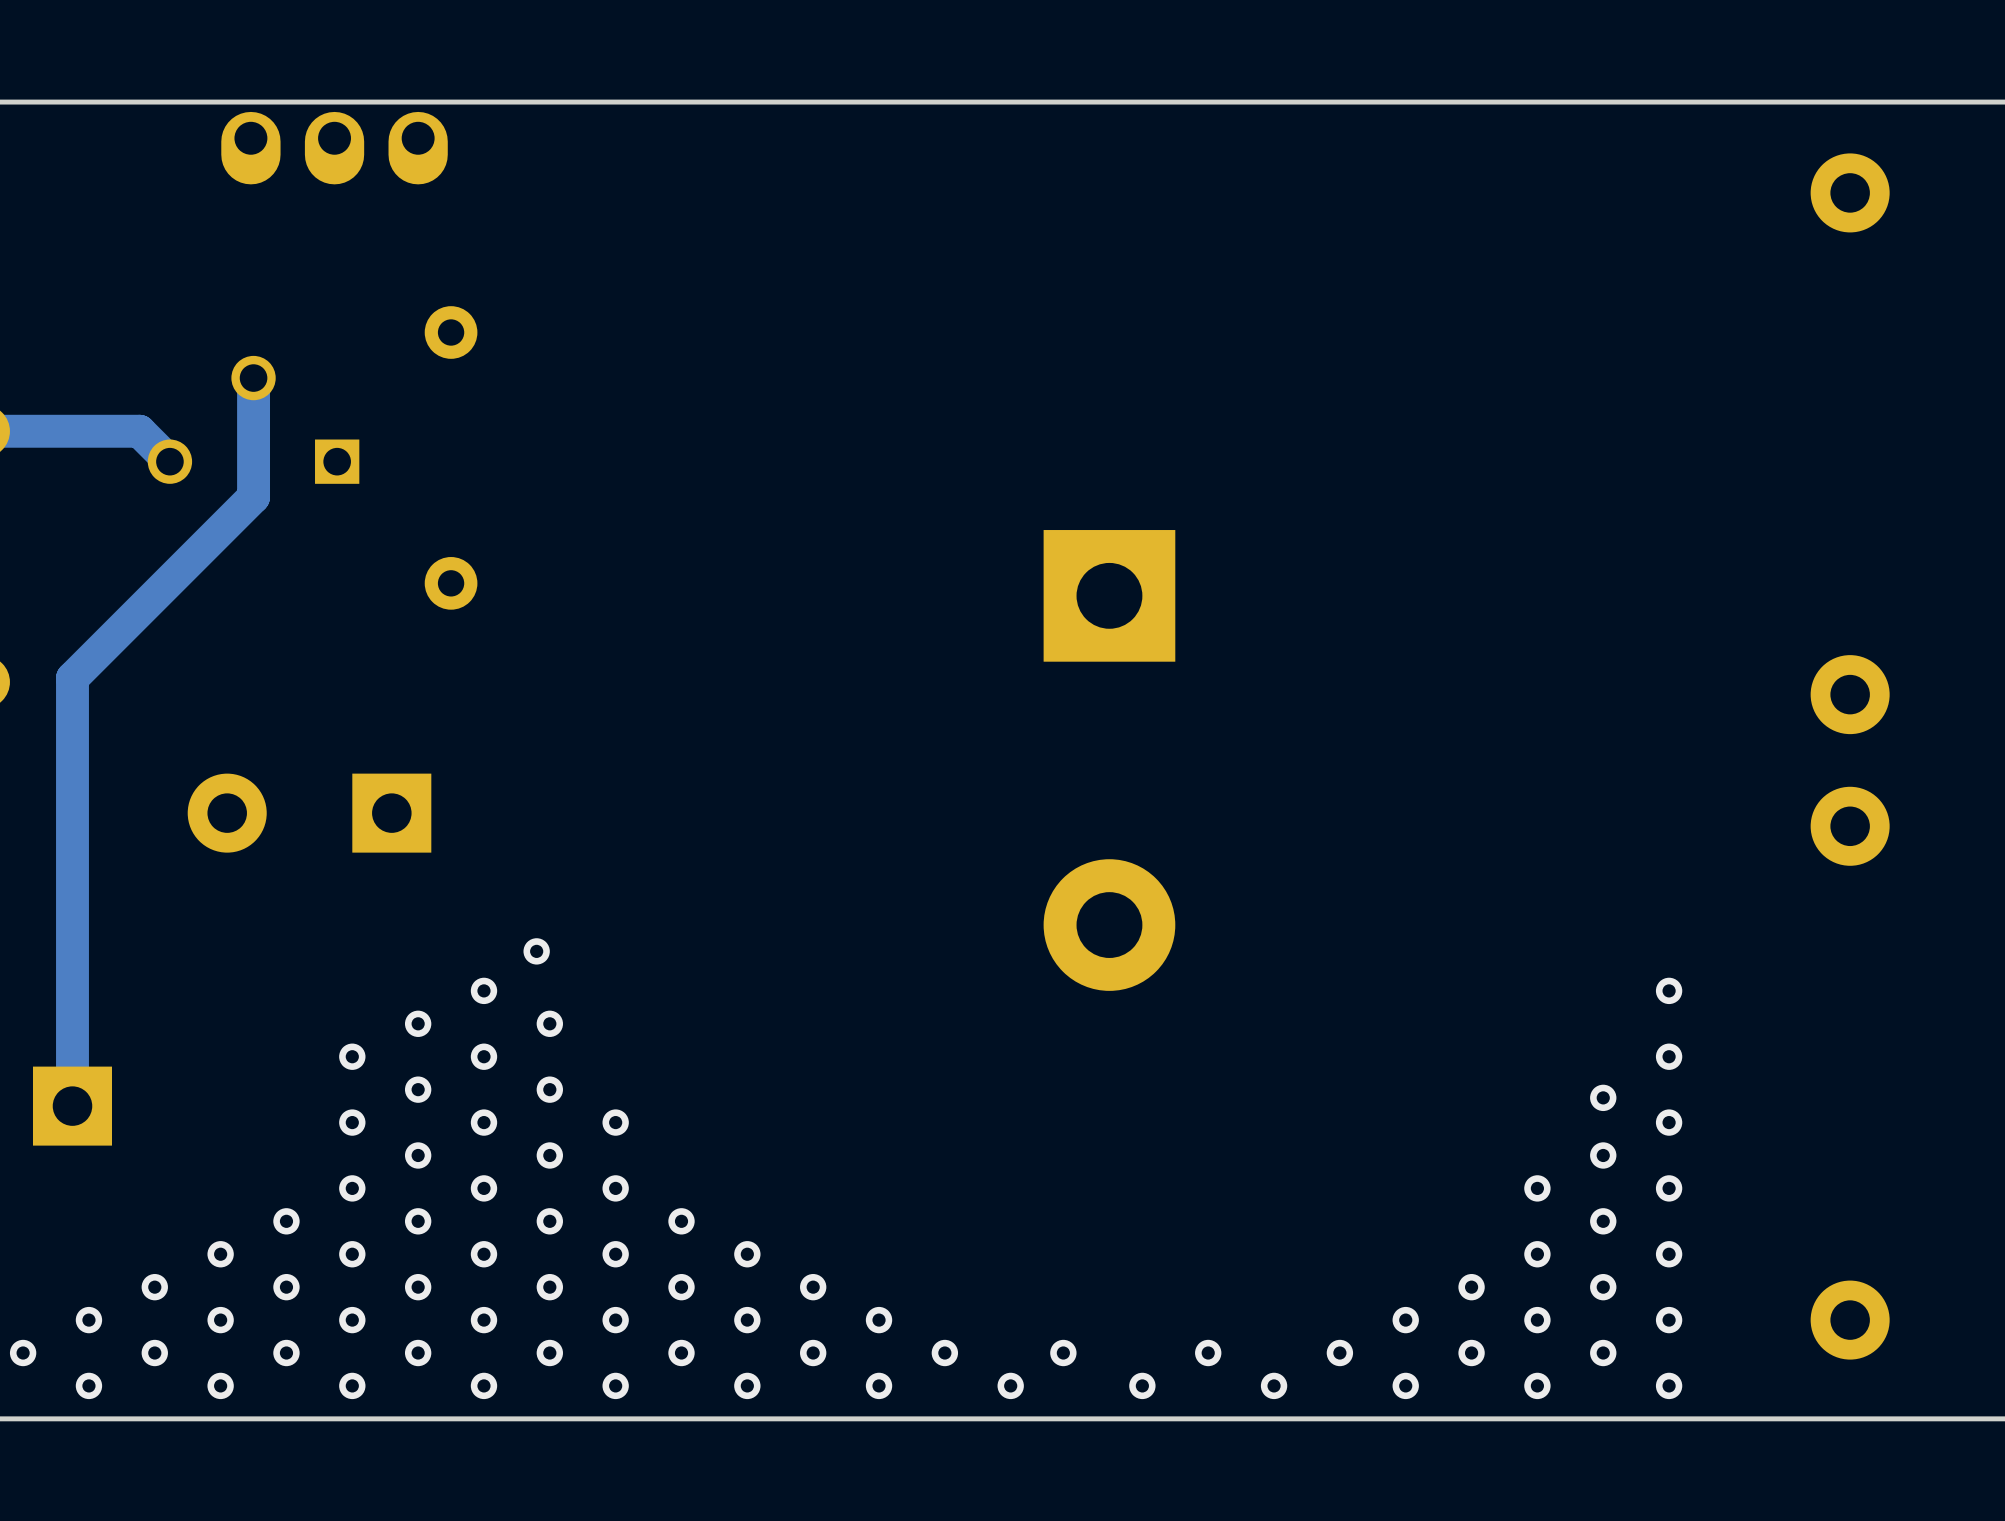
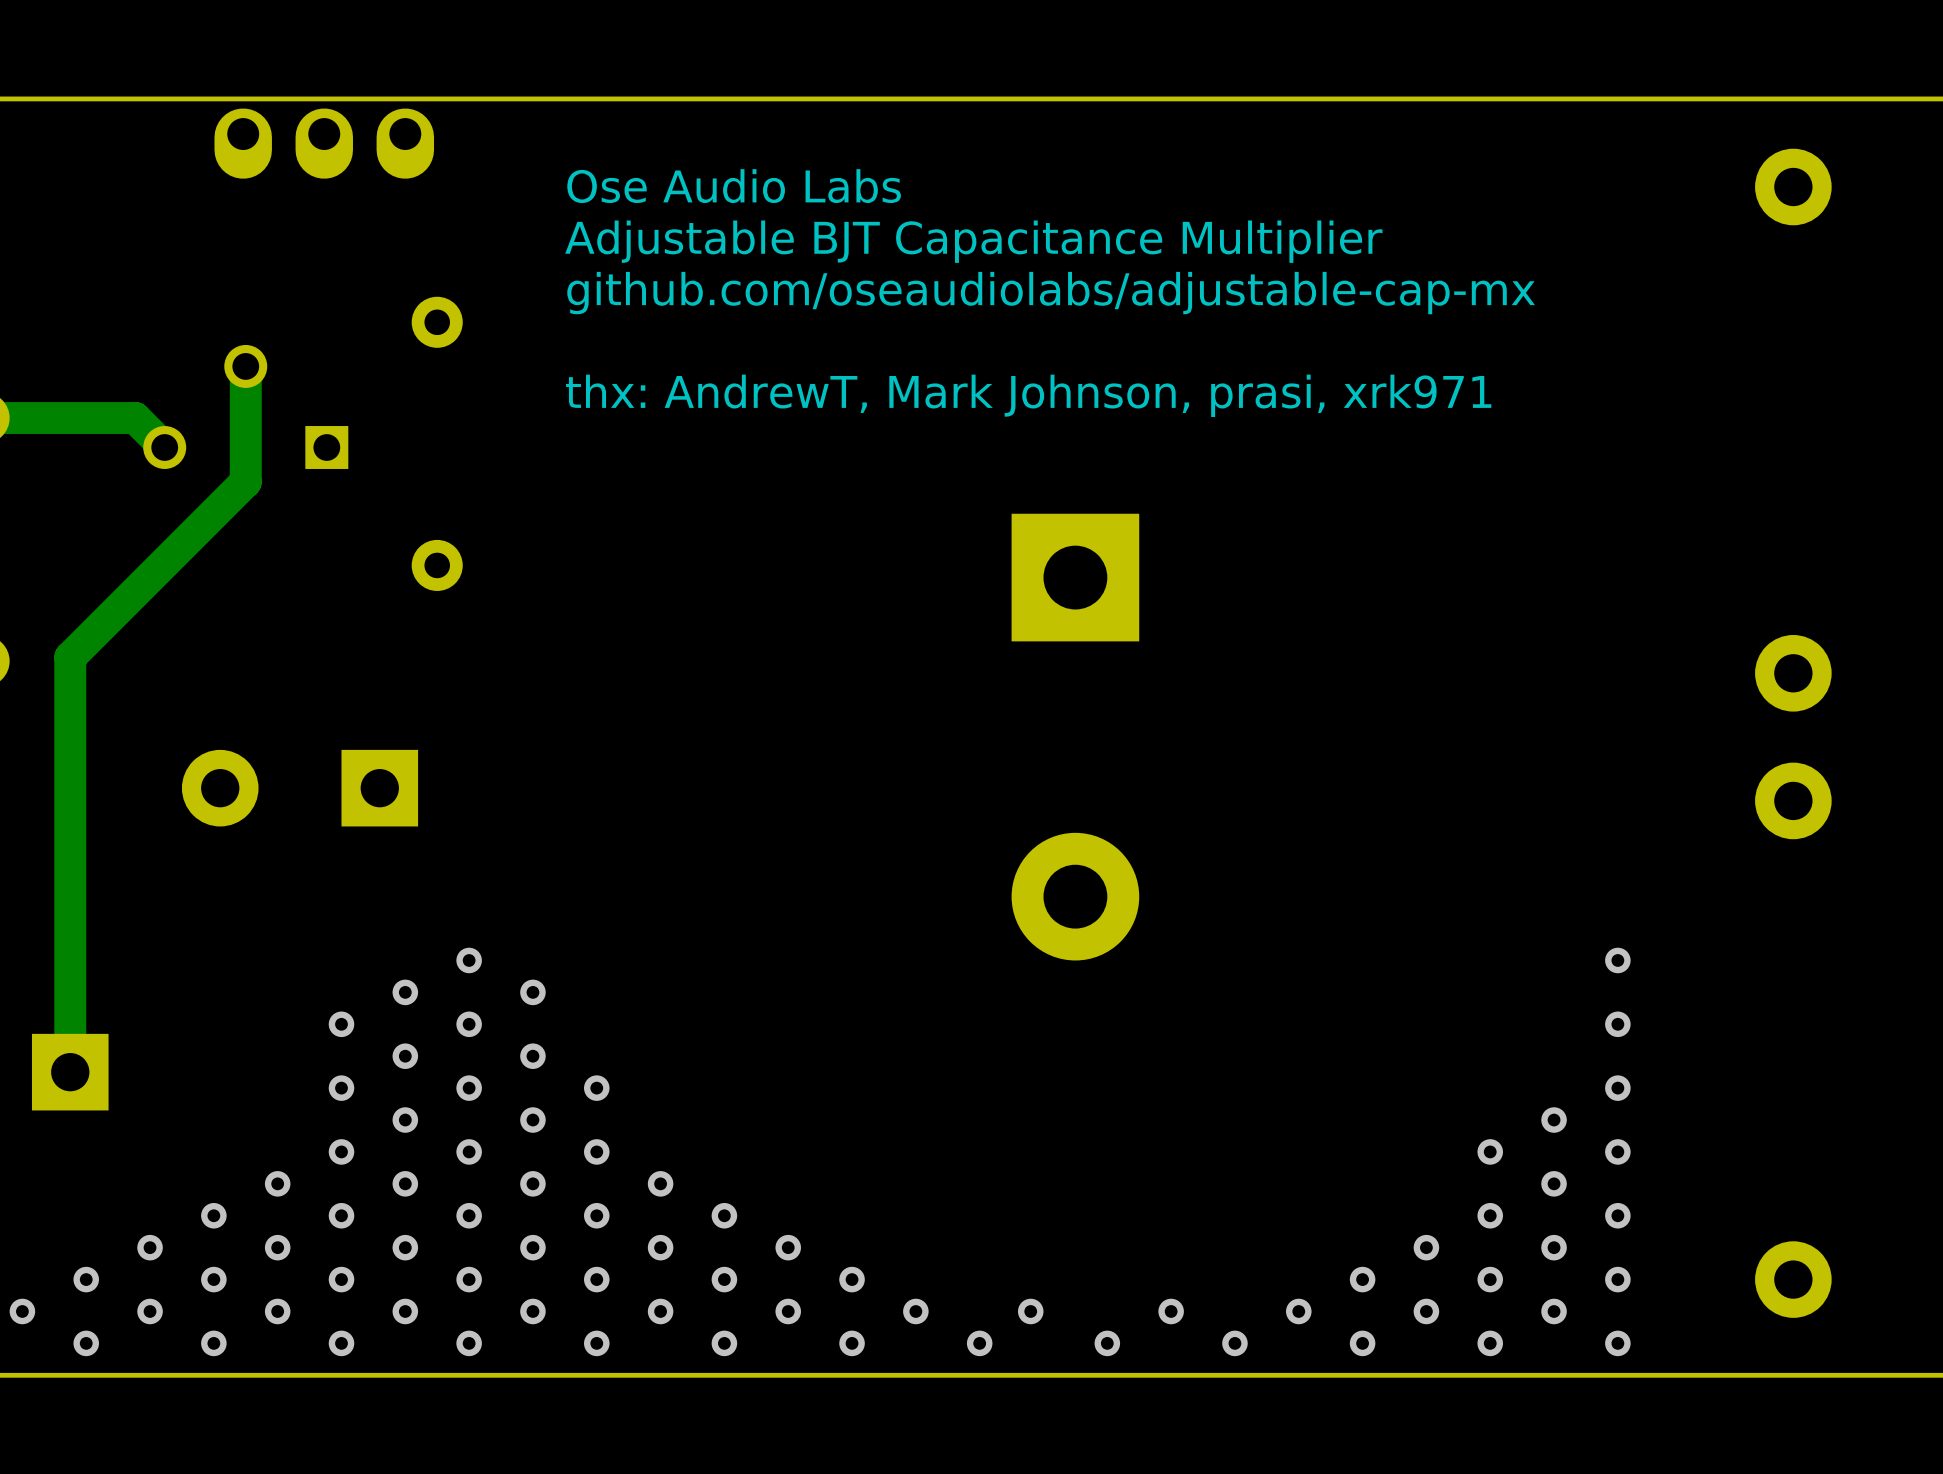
text: none -> Ose Audio Labs (734, 186)
text: none -> Adjustable BJT Capacitance Multiplier (973, 241)
text: none -> github.com/oseaudiolabs/adjustable-cap-mx (1051, 293)
text: none -> thx: AndrewT, Mark Johnson, prasi, xrk971 (1028, 395)
via: (536, 951) -> none
via: (1603, 1097) -> none

